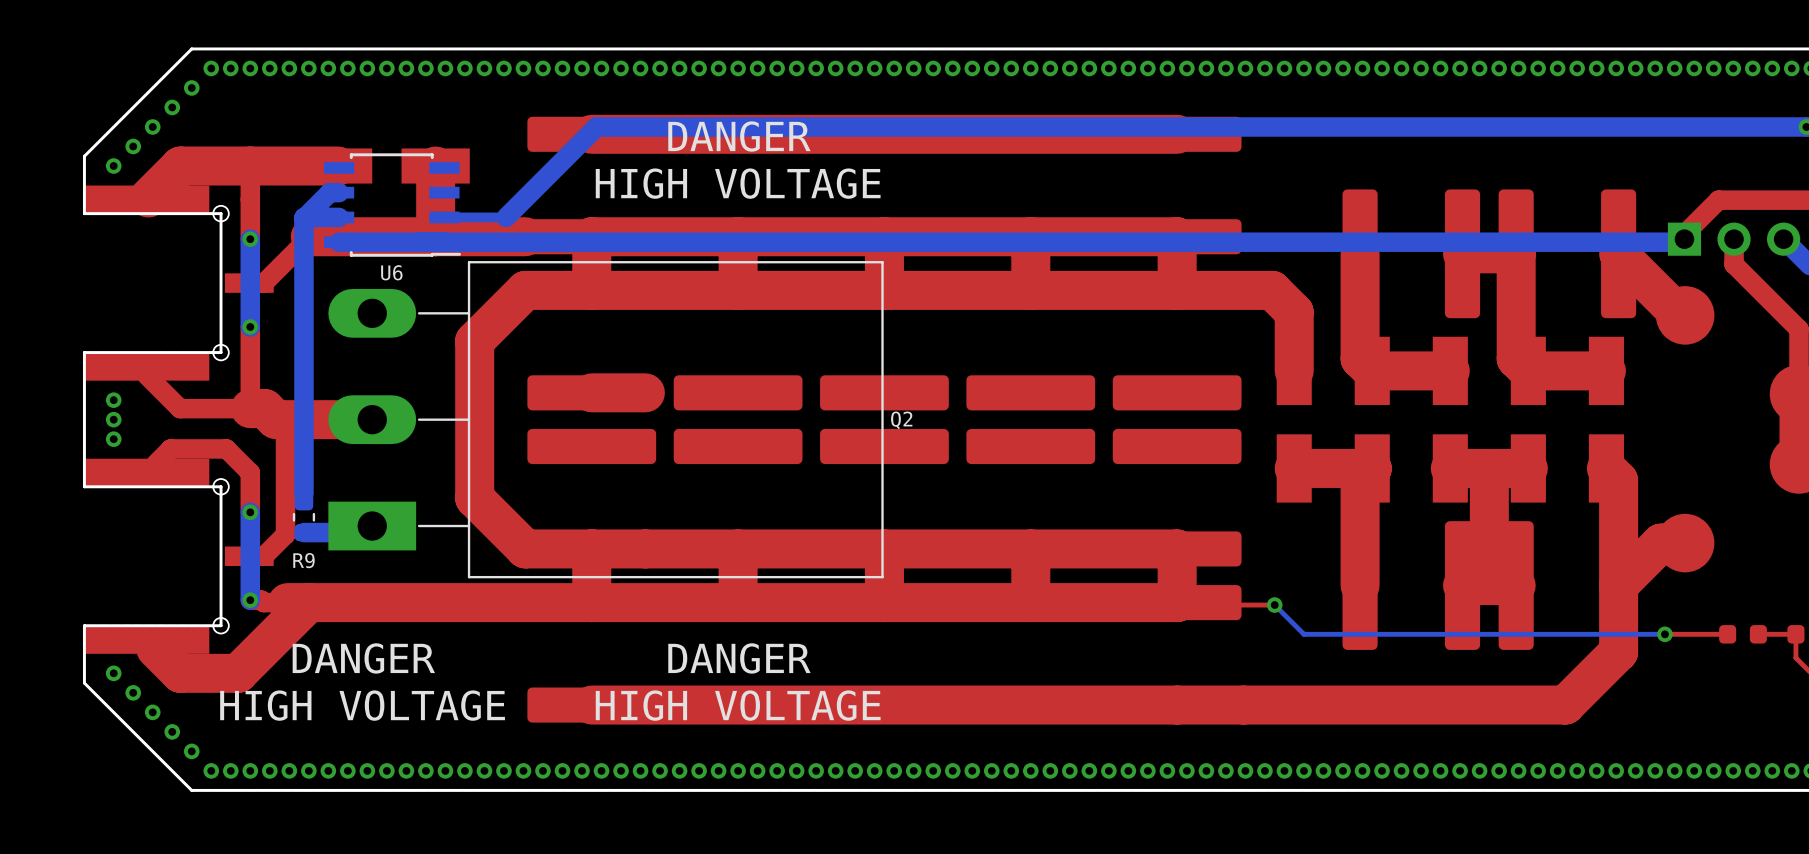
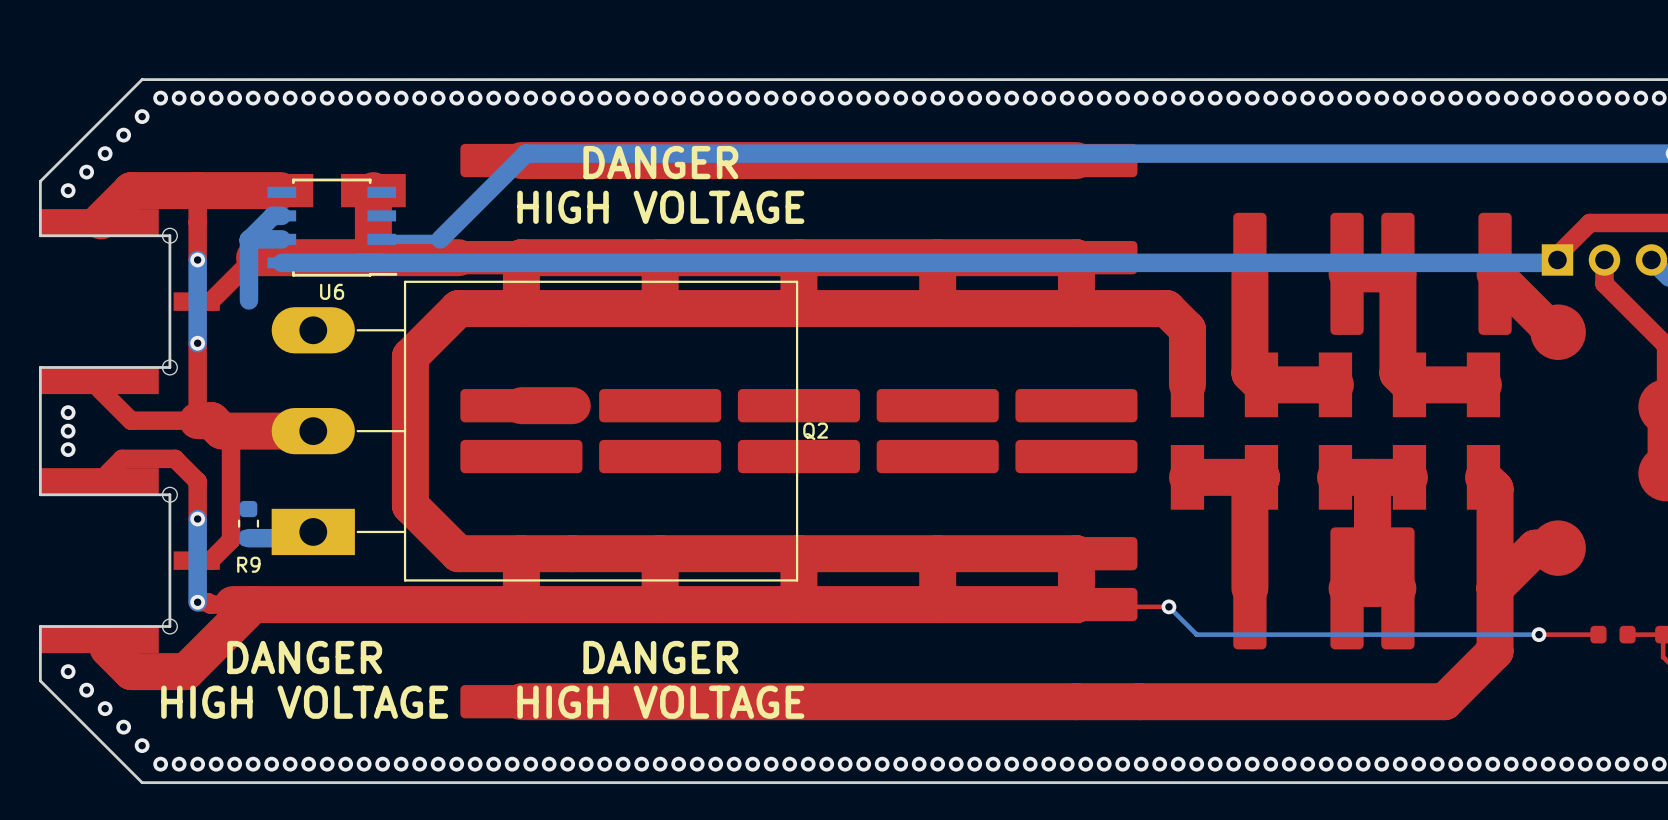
bottom track: (304, 217) (303, 493) -> (248, 239) (248, 300)

